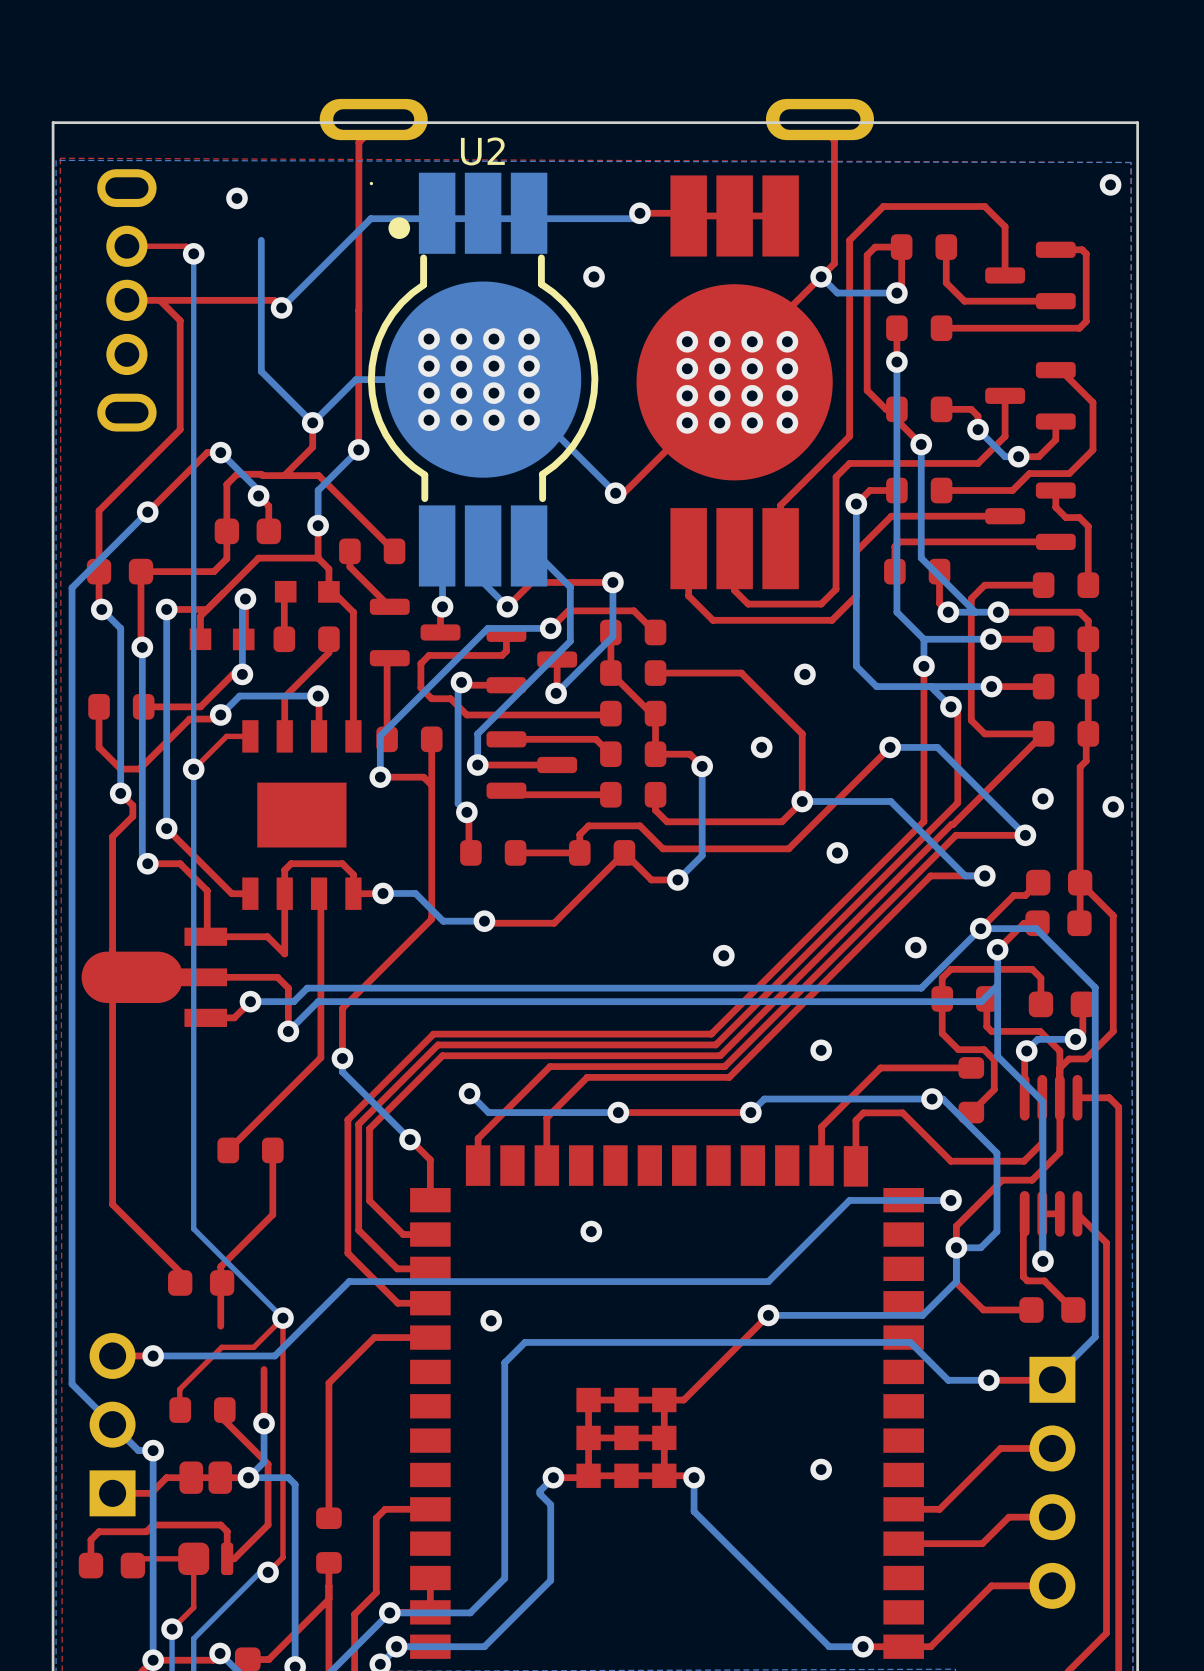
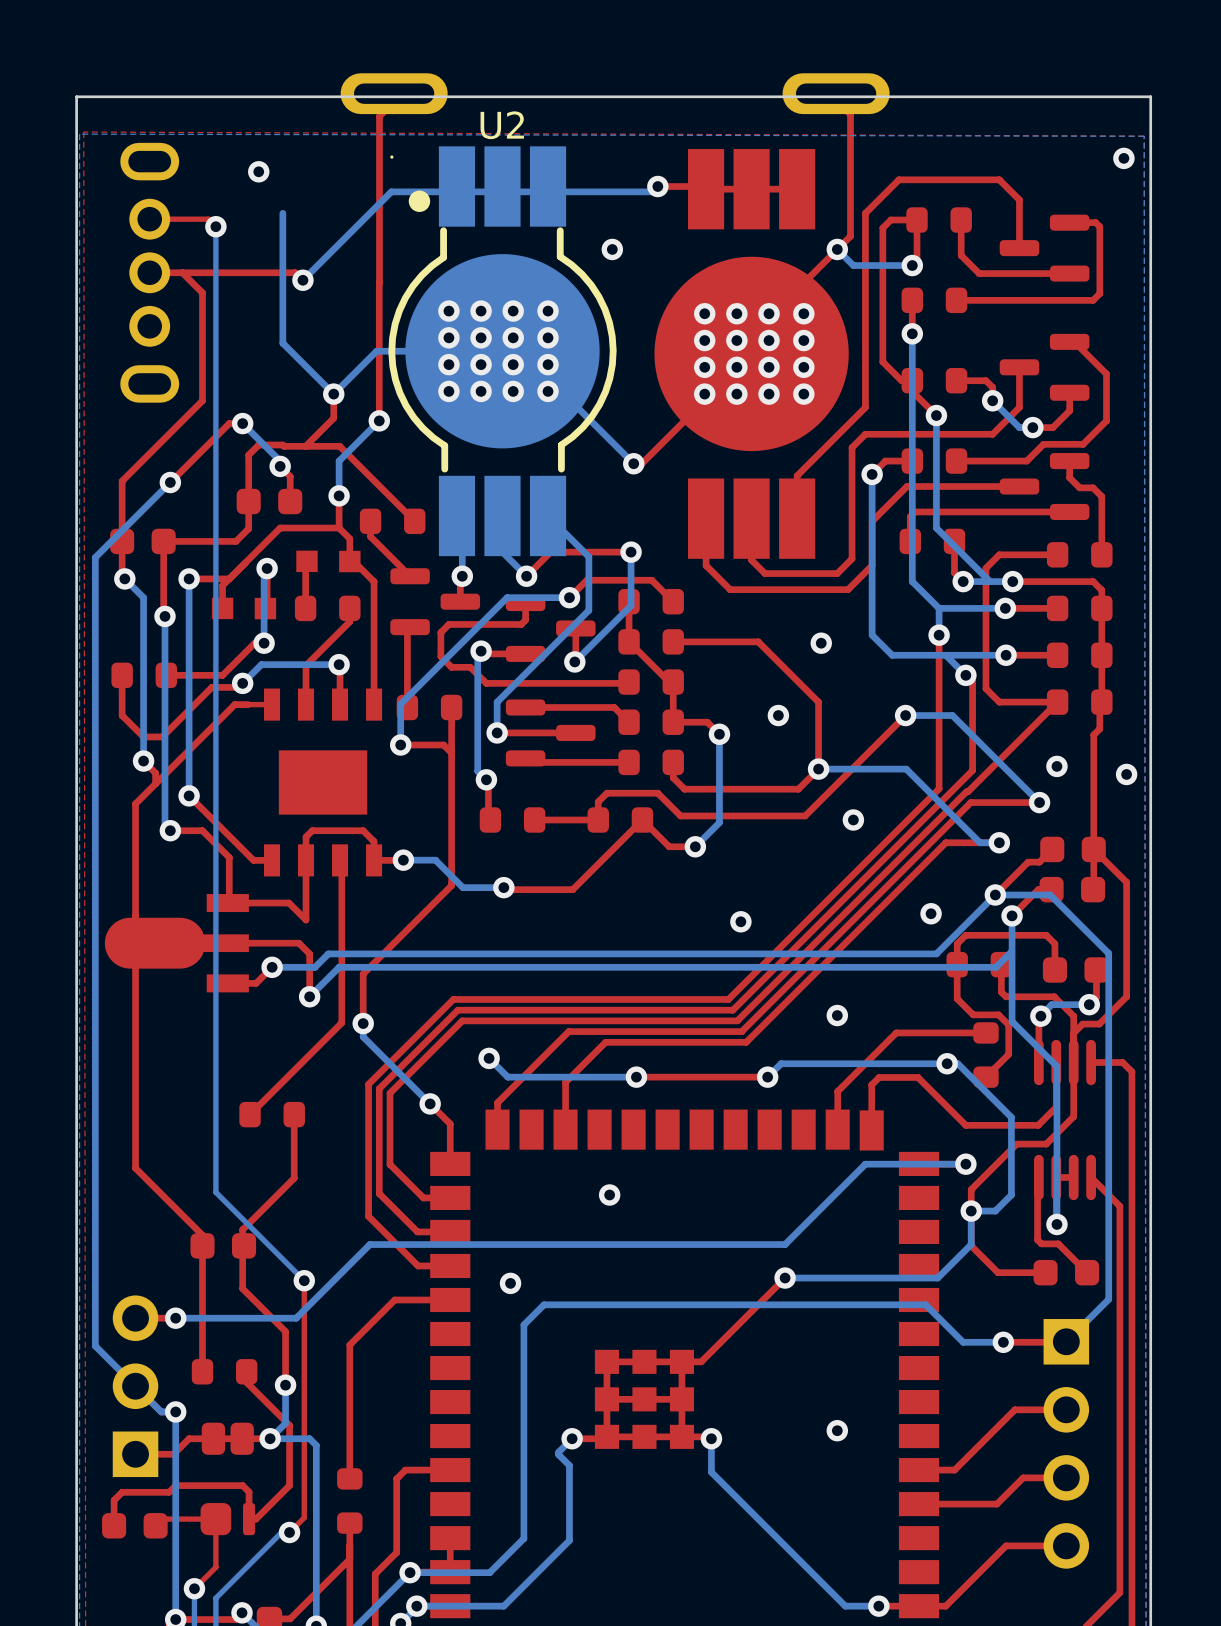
top track: (226, 736) (193, 769) -> (248, 704) (234, 704) (155, 783)
via: (193, 769) -> none
top track: (282, 1318) (253, 1347) (221, 1347) (179, 1389) (180, 1410) -> (202, 1235) (202, 1371)
top track: none -> (242, 1288) (285, 1331)

